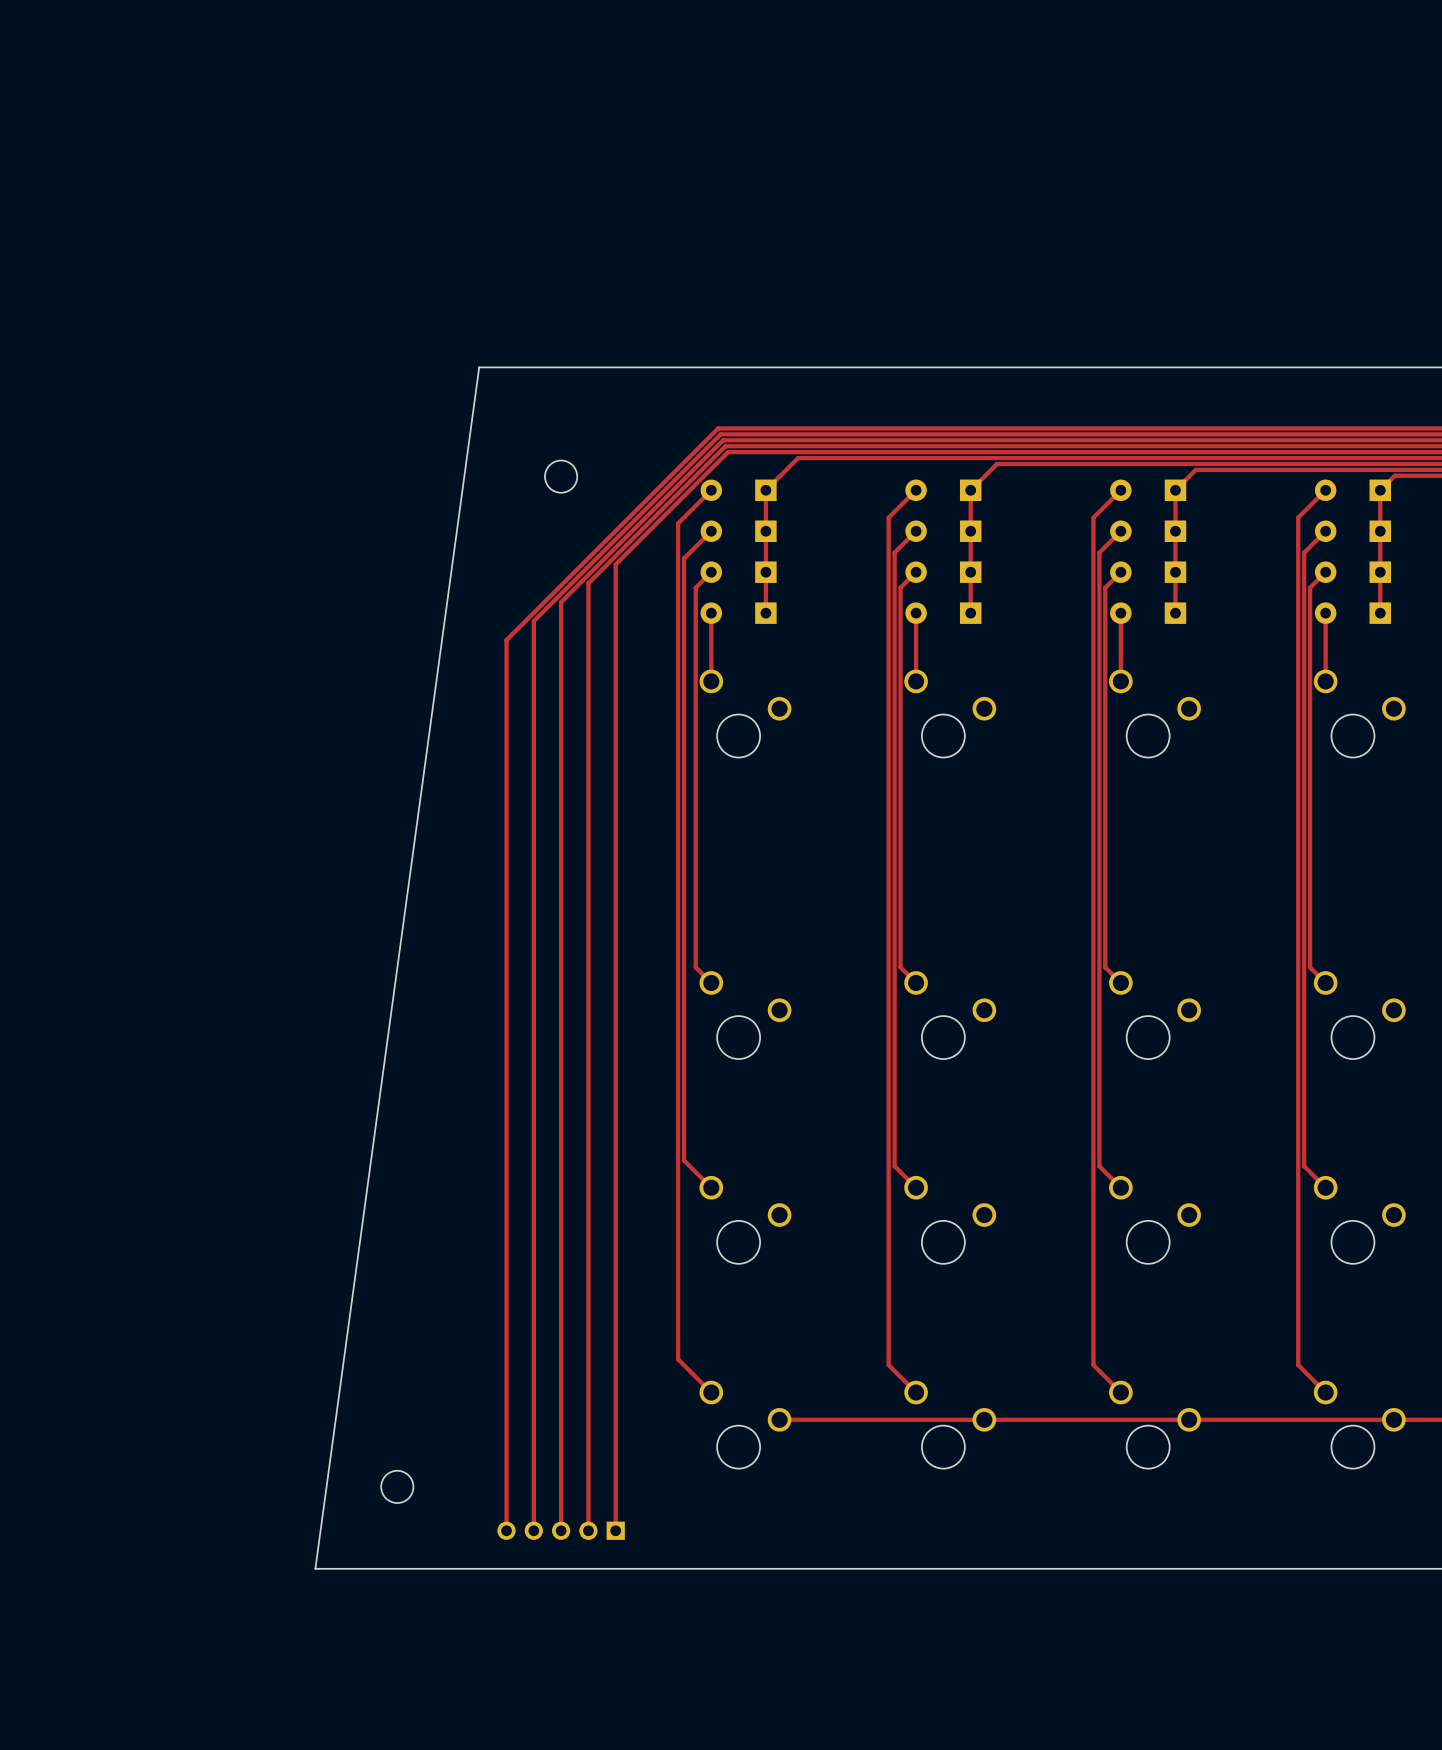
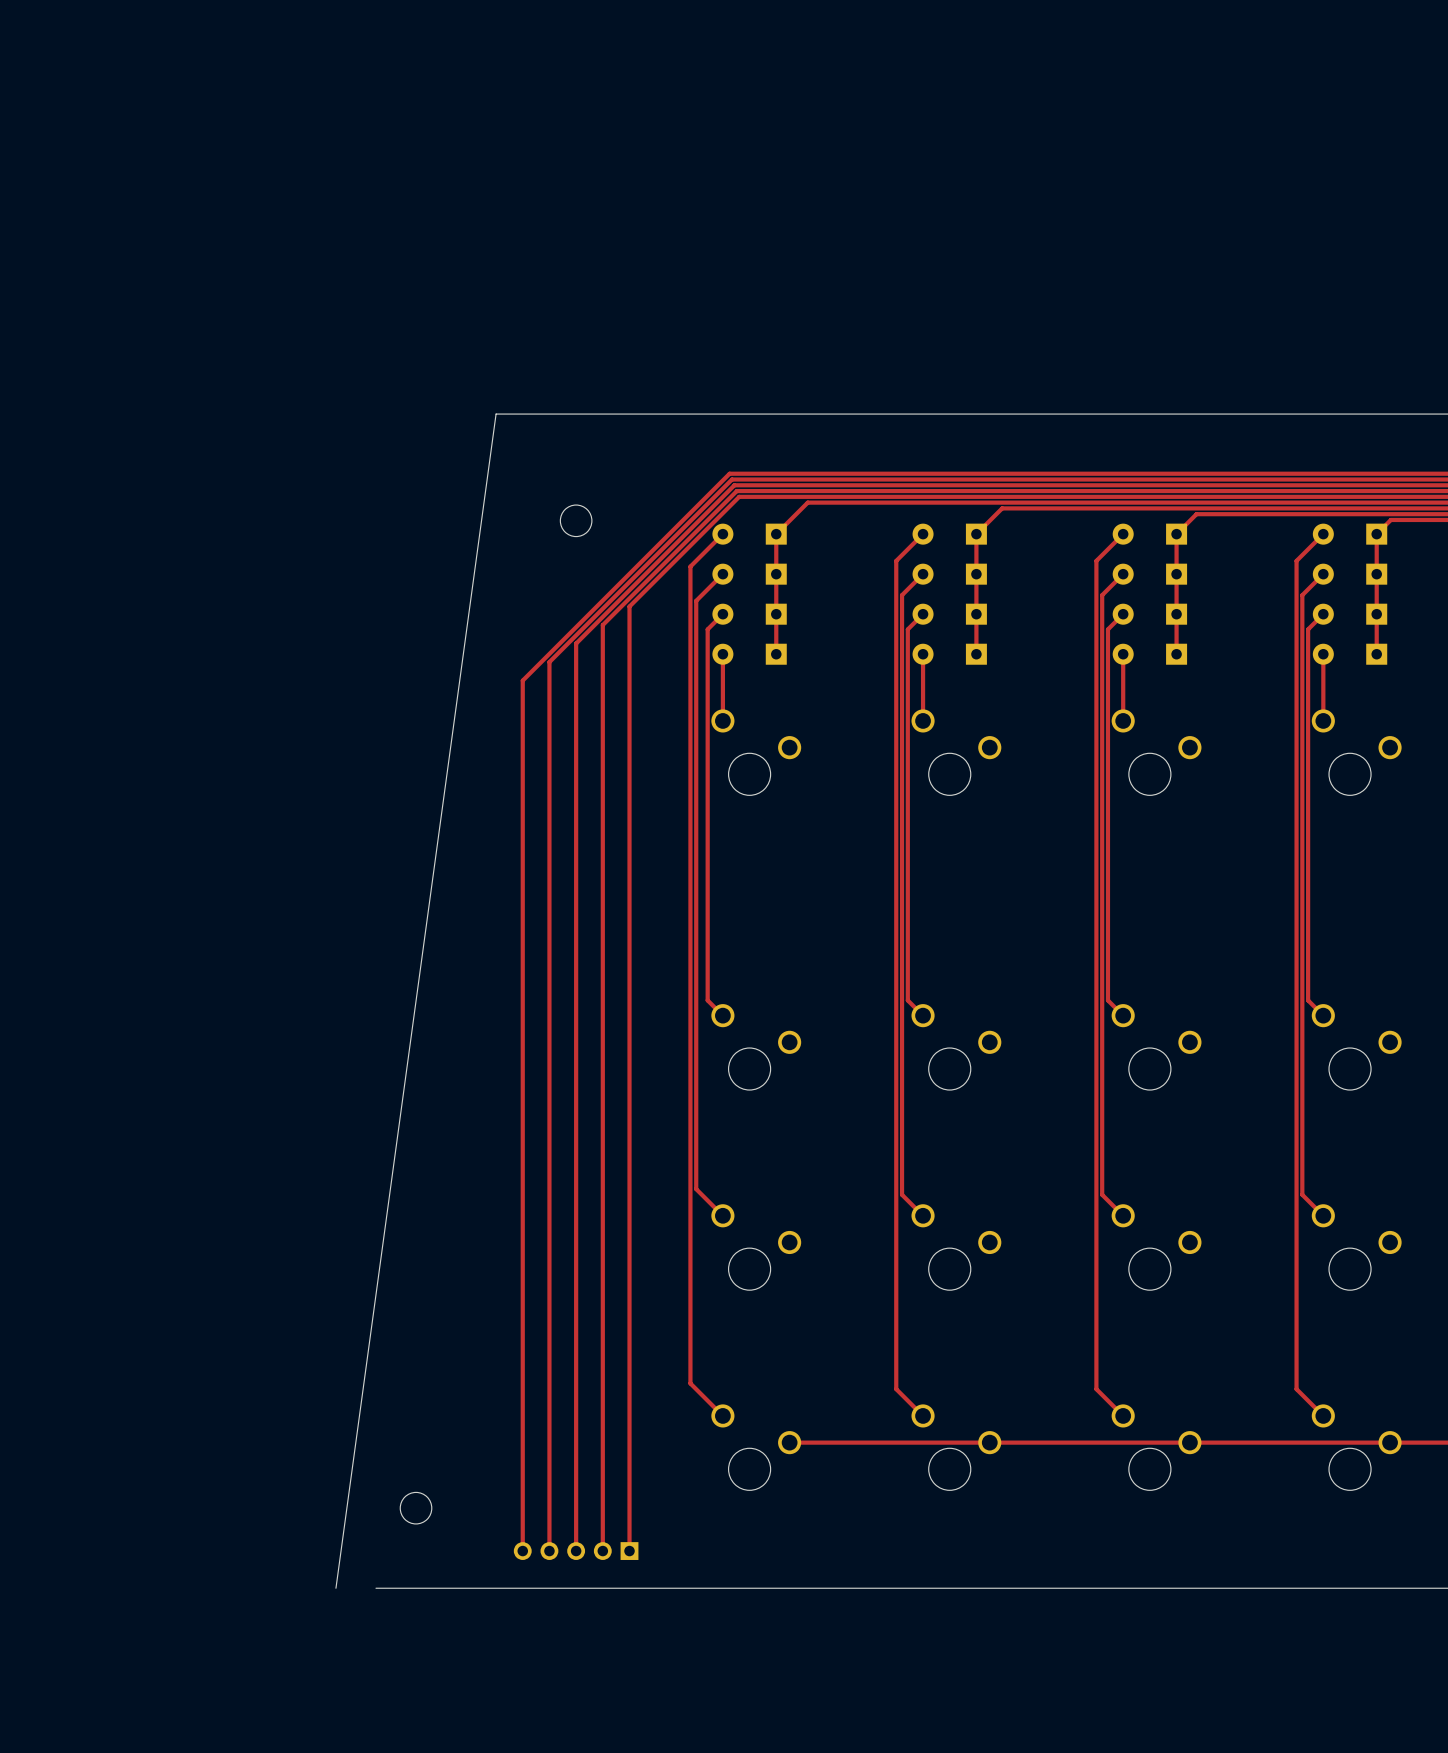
board edge: (356, 1568) (315, 1568) -> none

